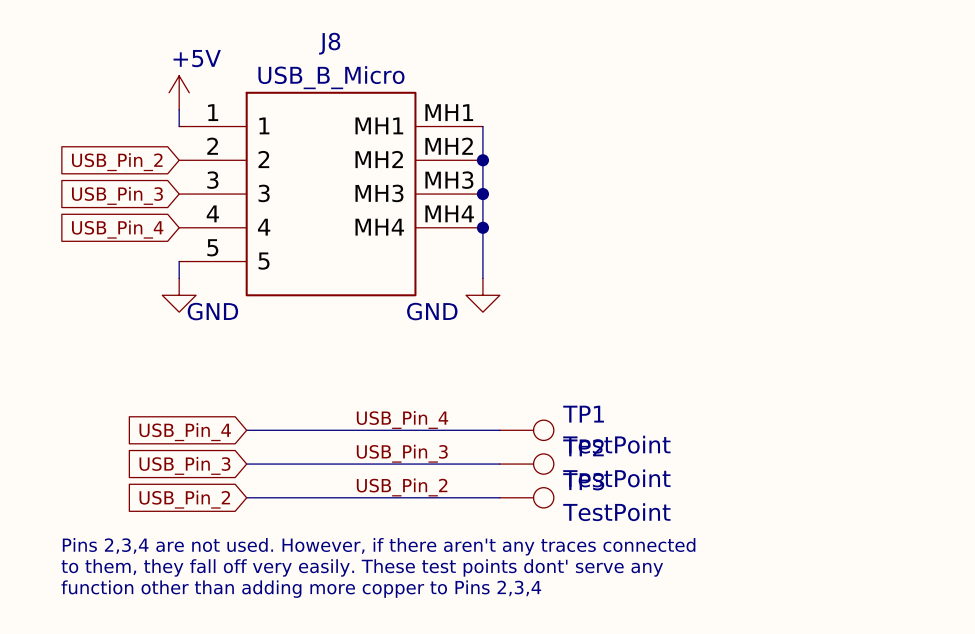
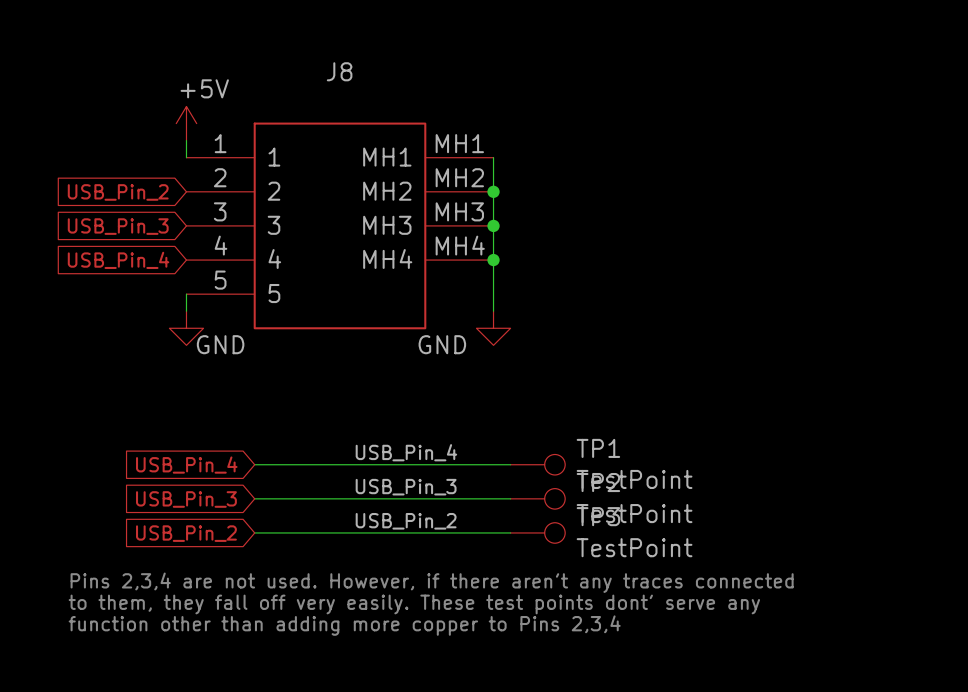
J8 value: USB_B_Micro (331, 77) -> none

